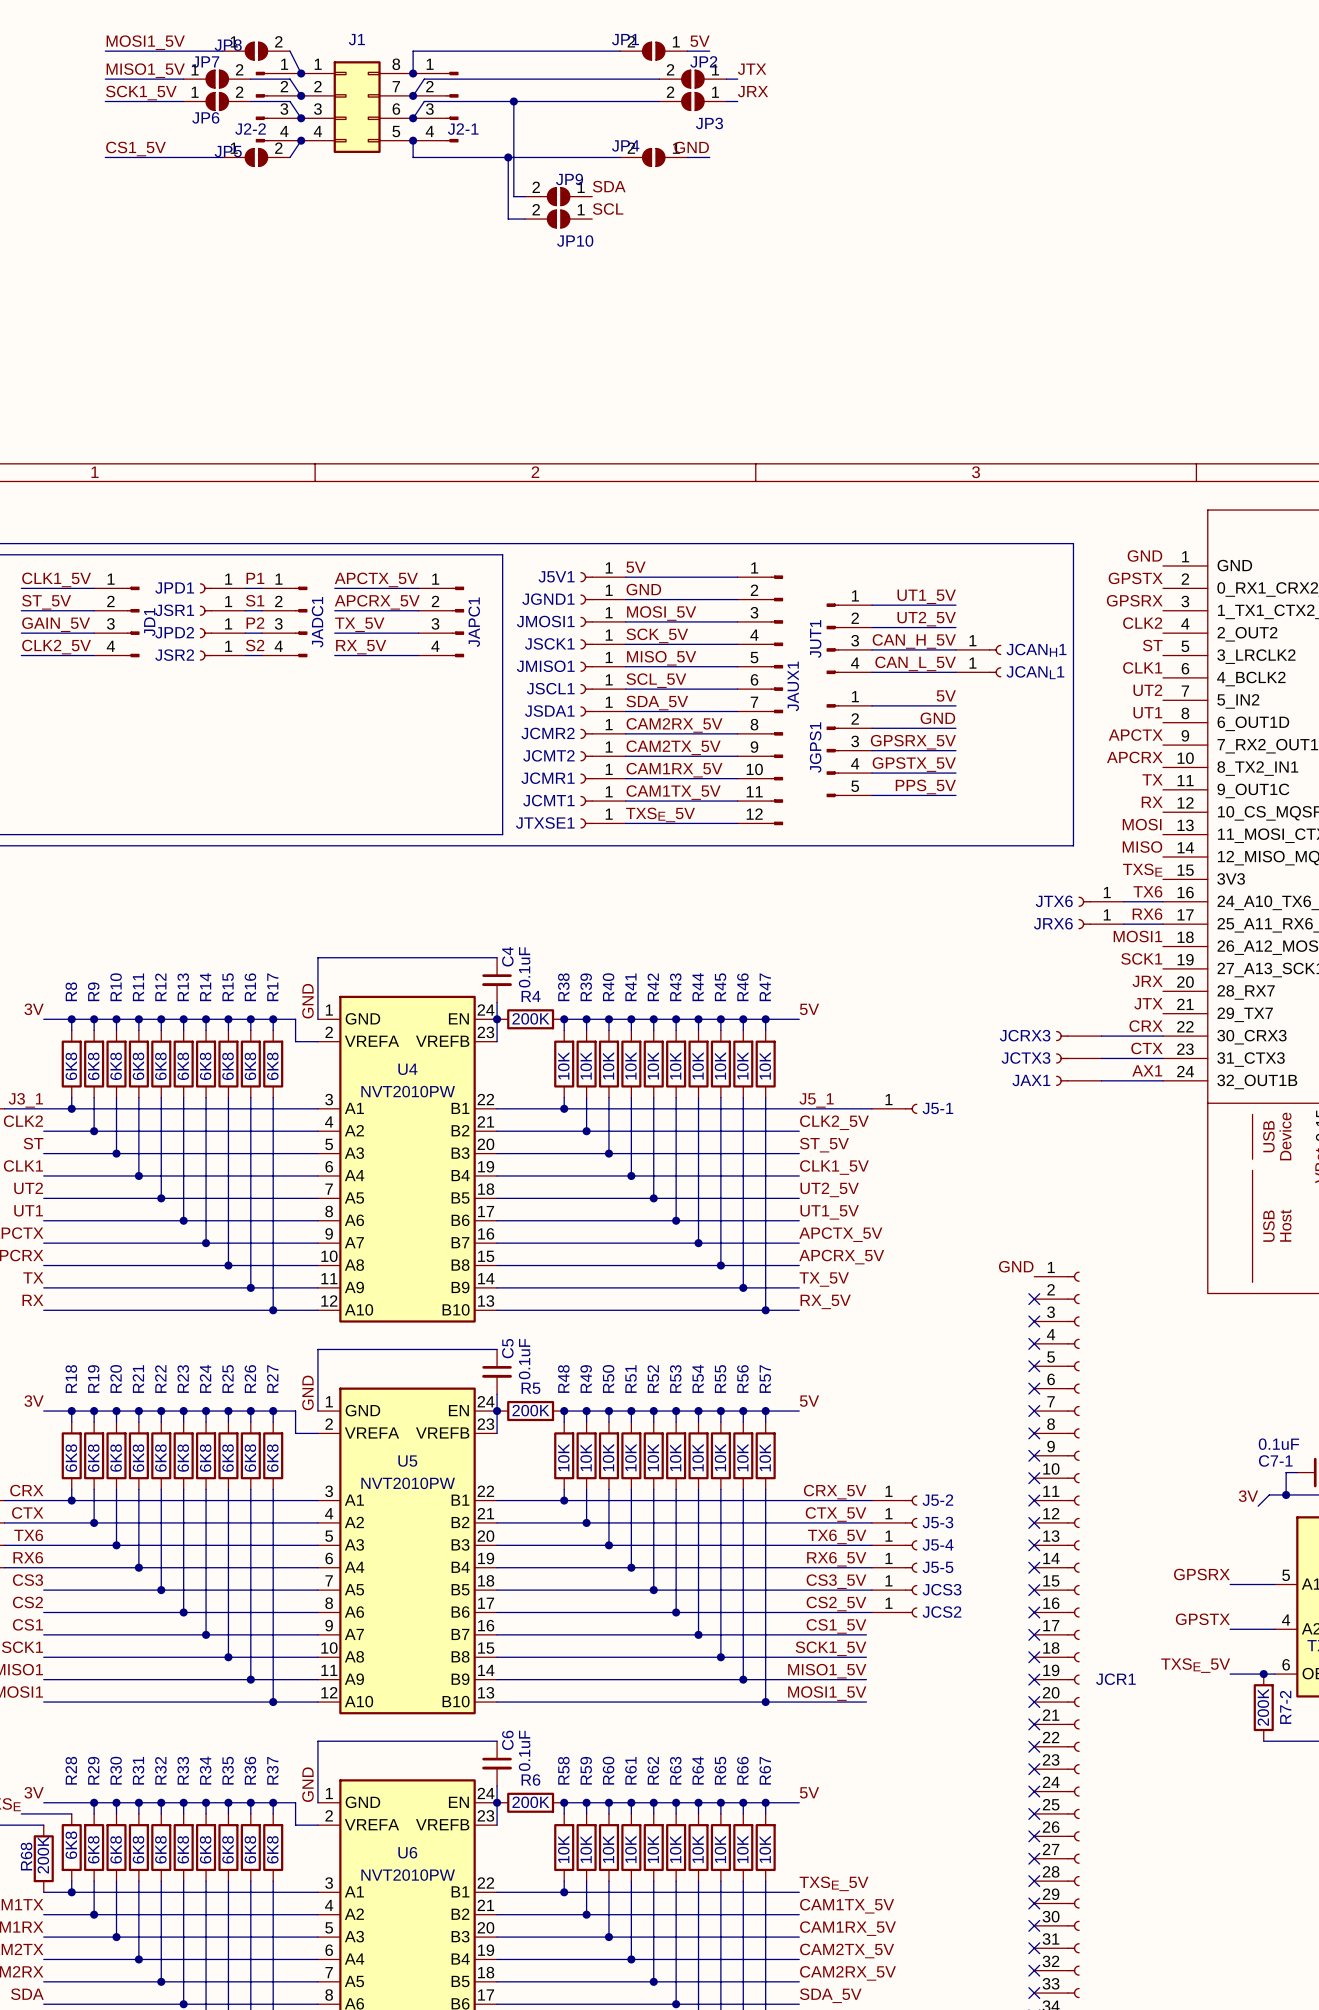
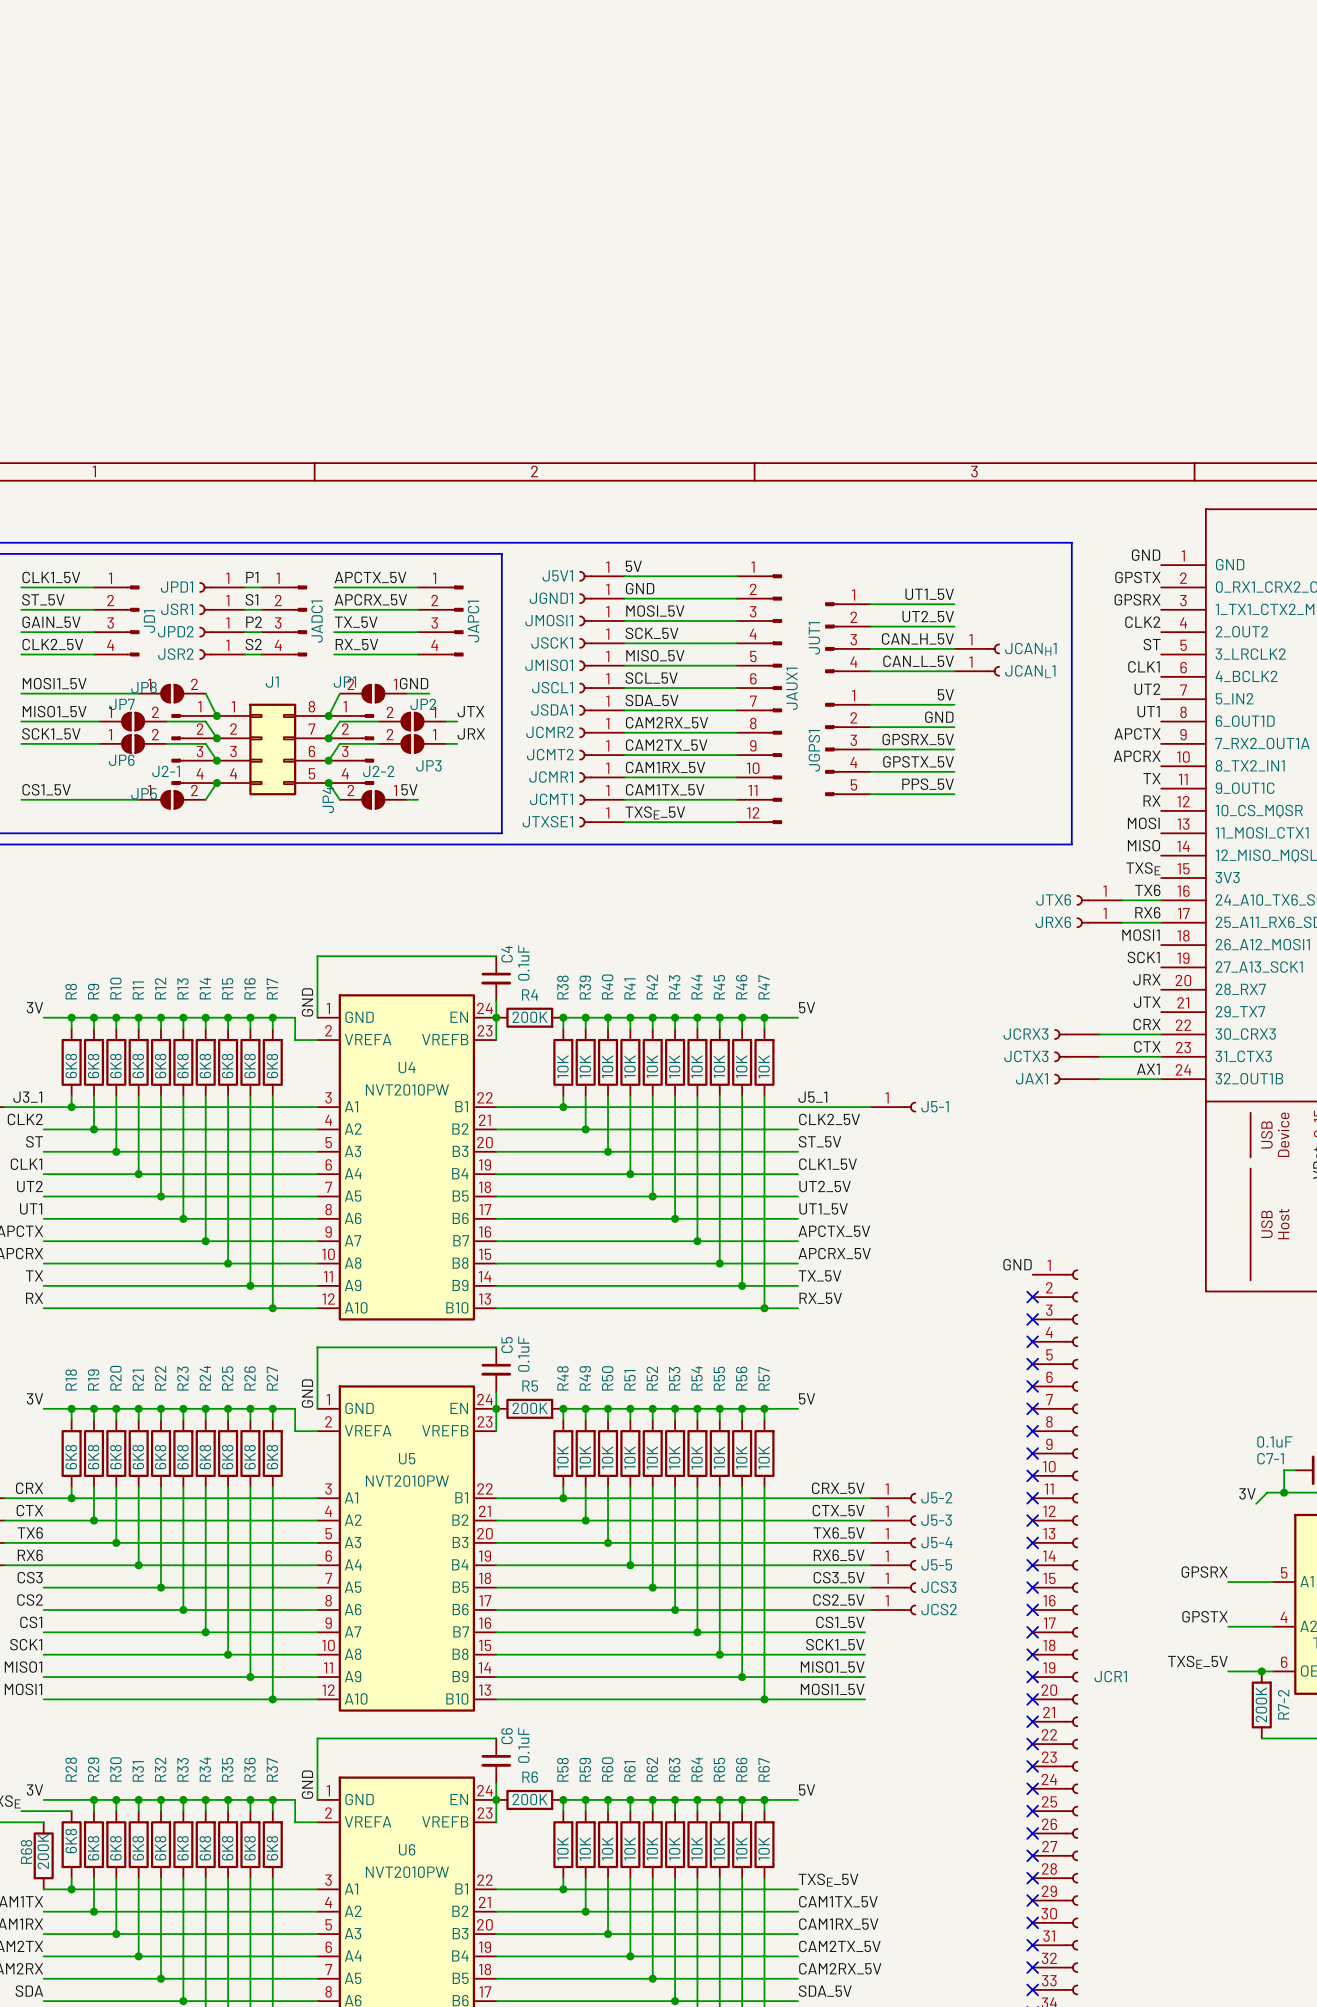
label: 5V (700, 41) -> none
label: MOSI1_5V (145, 42) -> none
wire: (105, 51) (222, 51) -> none
JP8 position: (256, 51) -> (172, 693)
wire: (289, 51) (301, 73) -> none
wire: (620, 51) (413, 51) (413, 73) -> none
JP1 position: (653, 51) -> (373, 693)
wire: (687, 51) (709, 51) -> none
label: JTX (752, 69) -> none
label: MISO1_5V (145, 70) -> none
junction: (301, 73) -> none
junction: (413, 73) -> none
wire: (105, 79) (183, 79) -> none
JP7 position: (217, 79) -> (133, 721)
wire: (250, 79) (289, 79) (301, 95) -> none
wire: (659, 79) (424, 79) (413, 95) -> none
JP2 position: (692, 79) -> (412, 721)
wire: (726, 79) (737, 79) -> none
label: JRX (753, 91) -> none
label: SCK1_5V (141, 93) -> none
junction: (301, 95) -> none
junction: (413, 95) -> none
wire: (105, 101) (183, 101) -> none
JP6 position: (217, 101) -> (133, 743)
wire: (250, 101) (289, 101) (301, 118) -> none
wire: (513, 101) (513, 196) (525, 196) -> none
junction: (513, 101) -> none
wire: (659, 101) (424, 101) (413, 118) -> none
JP3 position: (692, 101) -> (412, 743)
wire: (726, 101) (737, 101) -> none
J2-2 flip: as is (262, 107) -> left-right (367, 749)
J2-2 position: (278, 107) -> (351, 749)
J1 position: (357, 107) -> (272, 749)
J2-1 position: (435, 107) -> (194, 749)
J2-1 flip: as is (452, 107) -> left-right (177, 749)
junction: (301, 118) -> none
junction: (413, 118) -> none
wire: (301, 140) (289, 157) -> none
junction: (301, 140) -> none
wire: (413, 140) (413, 157) (620, 157) -> none
junction: (413, 140) -> none
JP4 name rotation: 0° (625, 145) -> 90° counterclockwise (328, 800)
label: GND (691, 147) -> none
label: CS1_5V (135, 149) -> none
wire: (105, 157) (222, 157) -> none
JP5 position: (256, 157) -> (172, 799)
wire: (508, 157) (508, 219) (525, 219) -> none
junction: (508, 157) -> none
JP4 position: (653, 157) -> (373, 799)
wire: (687, 157) (709, 157) -> none
label: SDA (609, 186) -> none
JP9: (558, 196) -> none
label: SCL (608, 209) -> none
JP10: (558, 219) -> none
label: none -> GND (414, 683)
label: none -> MOSI1_5V (54, 683)
wire: none -> (21, 693) (138, 693)
wire: none -> (205, 693) (216, 715)
wire: none -> (339, 693) (328, 715)
wire: none -> (406, 693) (429, 693)
label: none -> JTX (470, 711)
label: none -> MISO1_5V (54, 711)
junction: none -> (216, 715)
junction: none -> (328, 715)
wire: none -> (21, 721) (99, 721)
wire: none -> (166, 721) (205, 721) (216, 738)
wire: none -> (378, 721) (339, 721) (328, 738)
wire: none -> (445, 721) (457, 721)
label: none -> JRX (471, 734)
label: none -> SCK1_5V (51, 733)
junction: none -> (216, 738)
junction: none -> (328, 738)
wire: none -> (21, 743) (99, 743)
wire: none -> (166, 743) (205, 743) (216, 760)
wire: none -> (378, 743) (339, 743) (328, 760)
wire: none -> (445, 743) (457, 743)
junction: none -> (216, 760)
junction: none -> (328, 760)
wire: none -> (216, 783) (205, 799)
junction: none -> (216, 783)
wire: none -> (328, 783) (339, 799)
junction: none -> (328, 783)
label: none -> 5V (409, 789)
label: none -> CS1_5V (46, 789)
wire: none -> (21, 799) (138, 799)
wire: none -> (406, 799) (418, 799)

